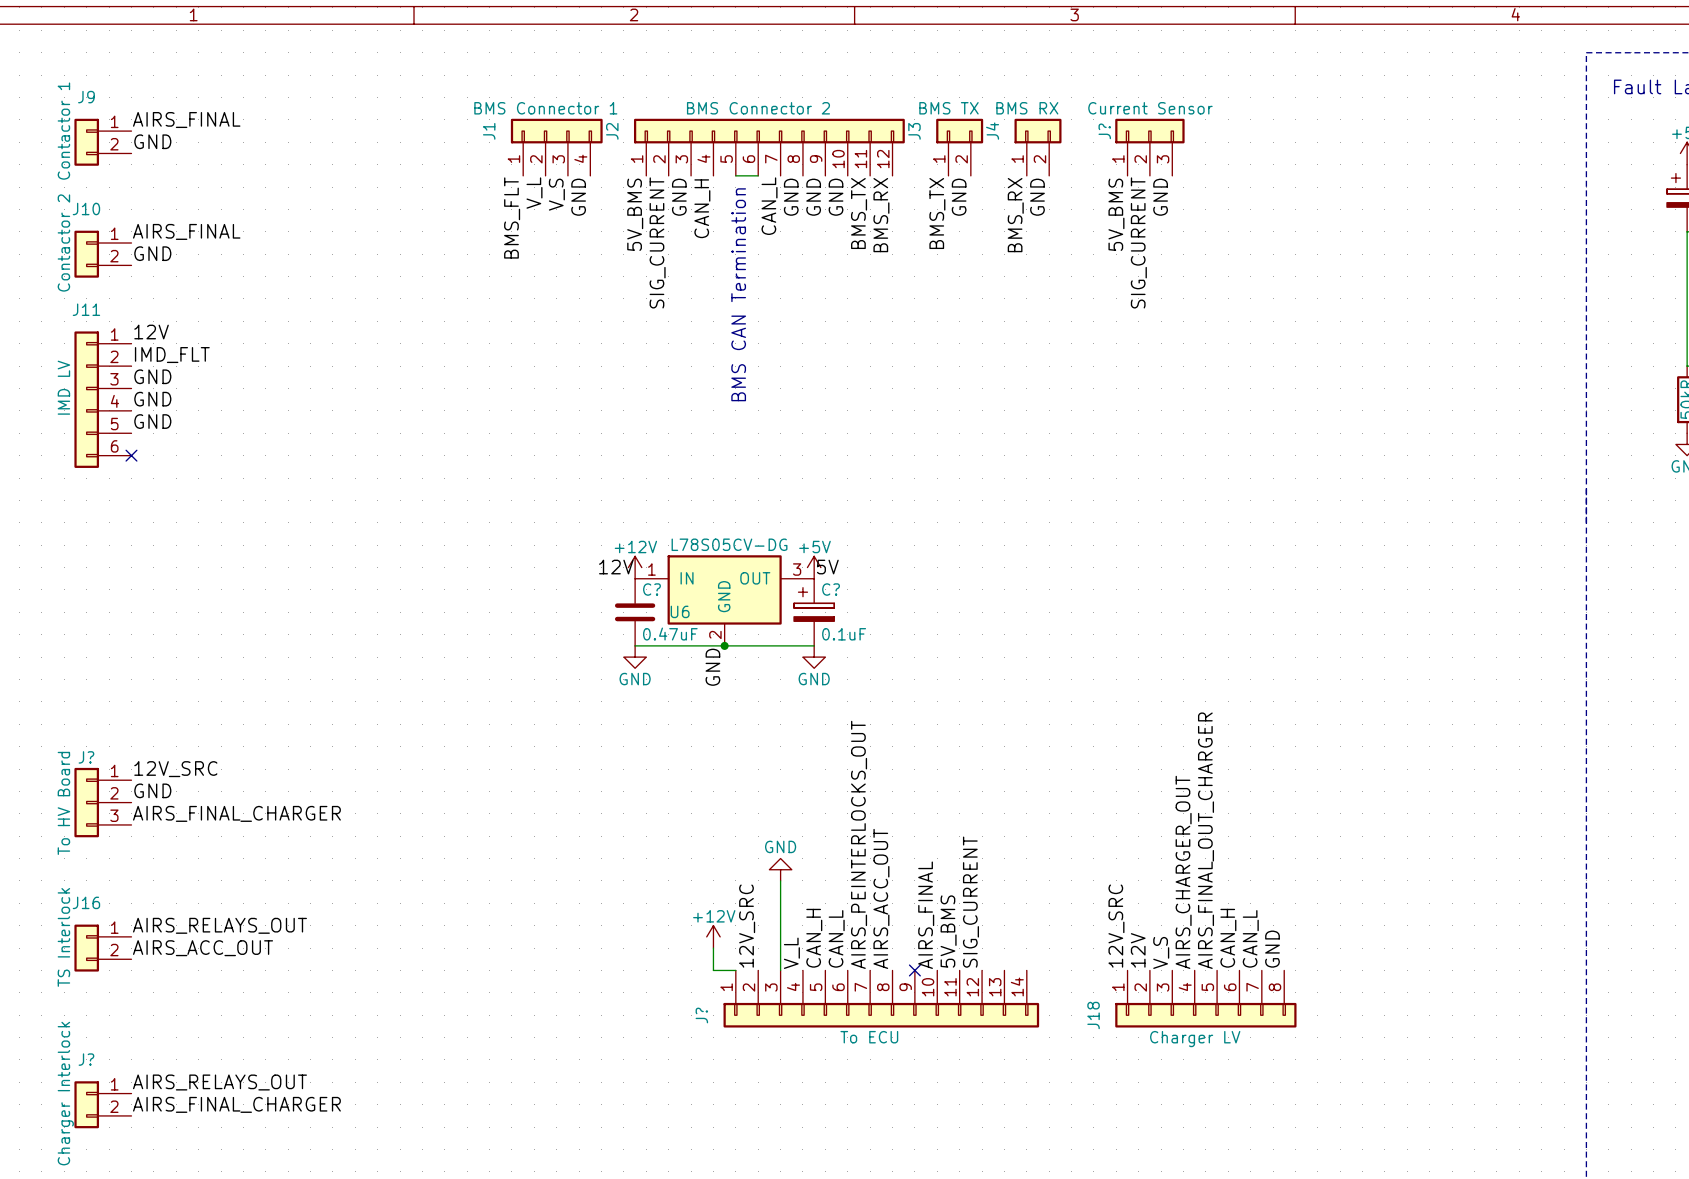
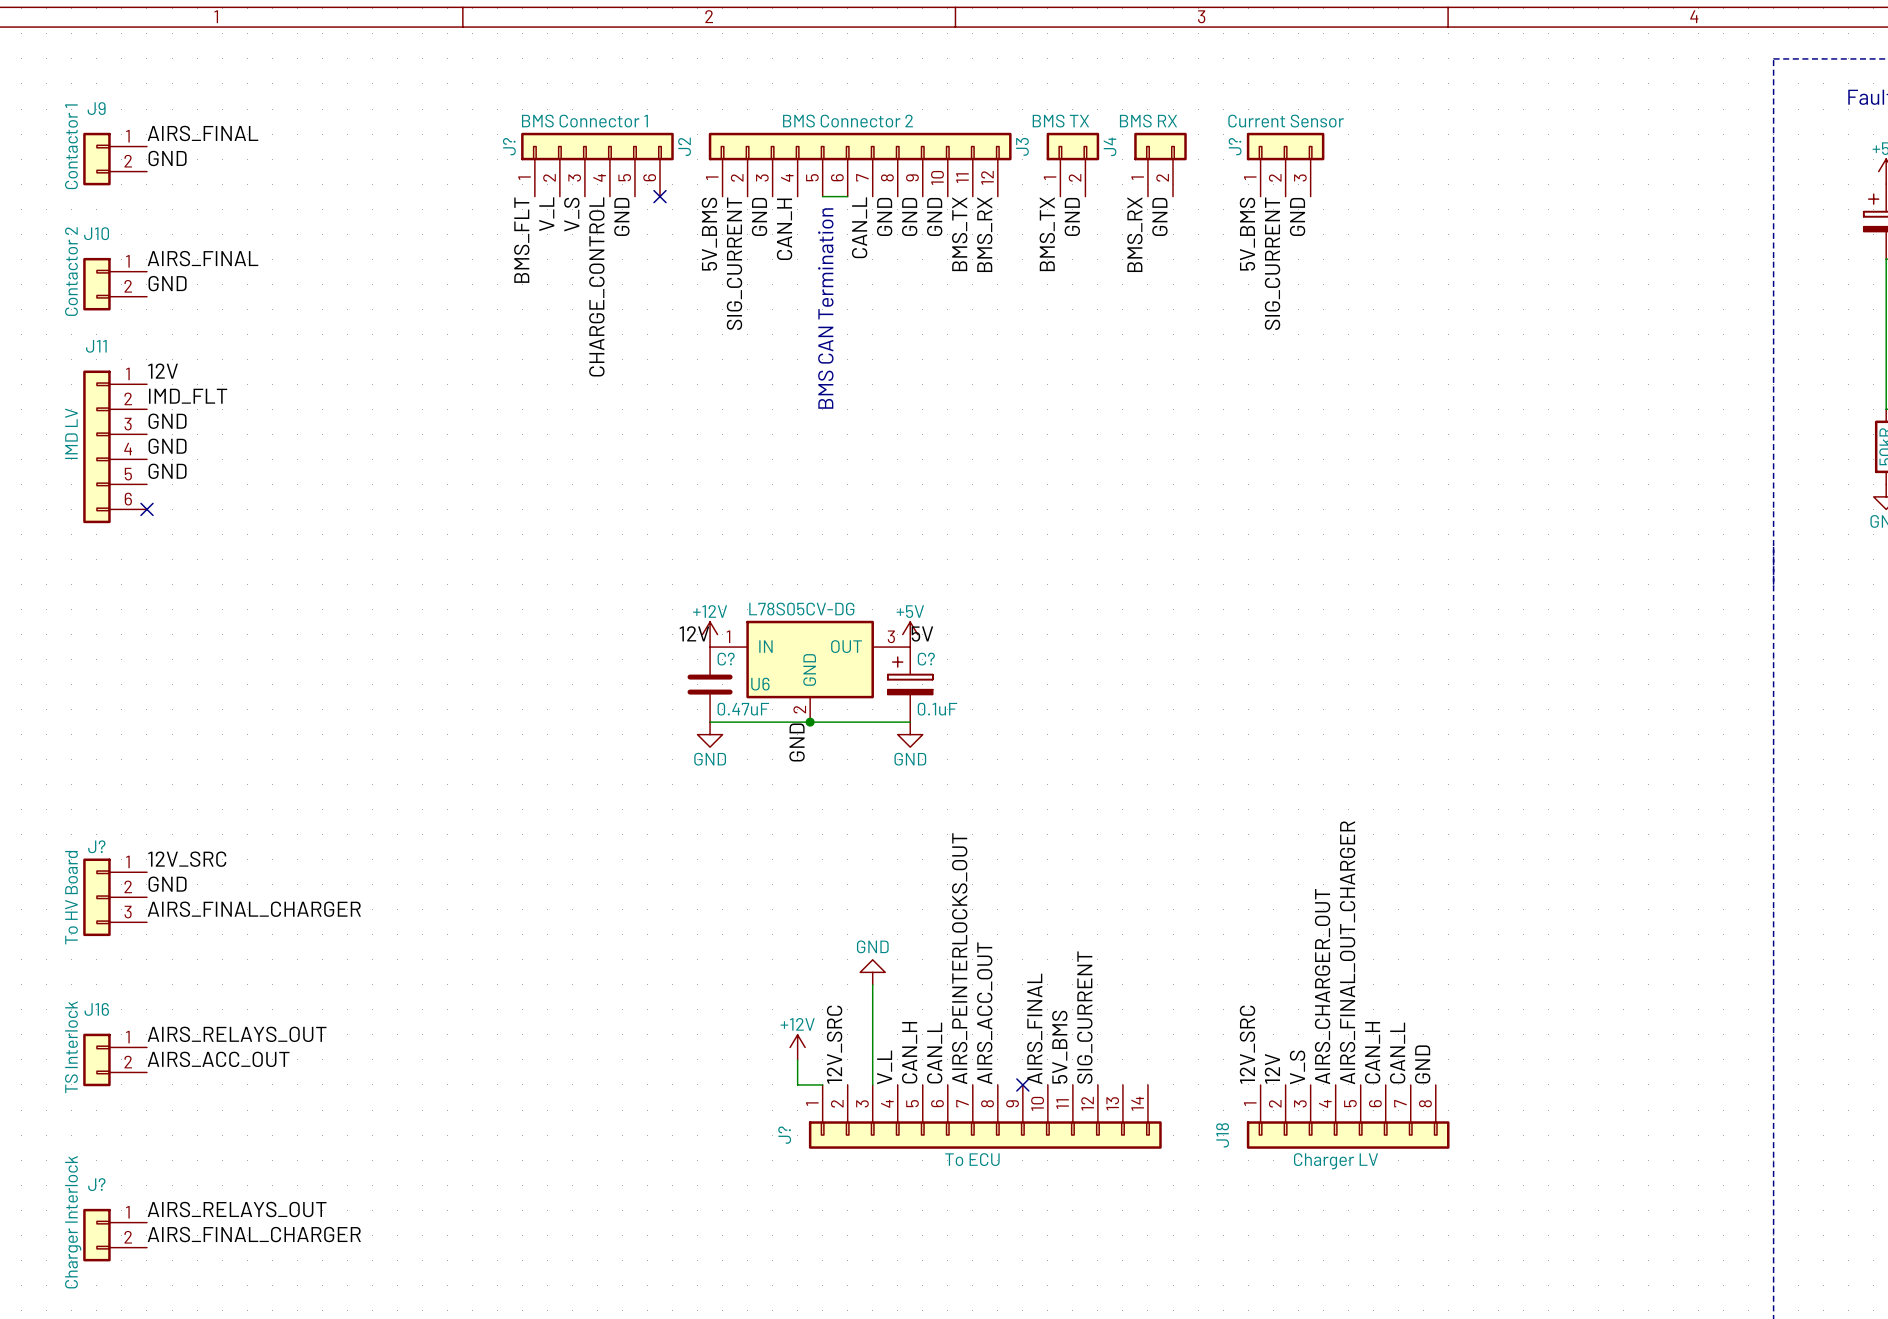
J?: none -> BMS Connector 1 (597, 164)
J1: BMS Connector 1 (556, 147) -> none
no-connect mark: none -> (659, 196)
label: none -> V_L (546, 214)
label: V_L (534, 193) -> CHARGE_CONTROL (596, 286)
label: V_S (556, 194) -> GND (621, 216)
label: GND (578, 197) -> none
label: none -> BMS_FLT (521, 240)
label: BMS_FLT (512, 217) -> V_S (571, 214)

